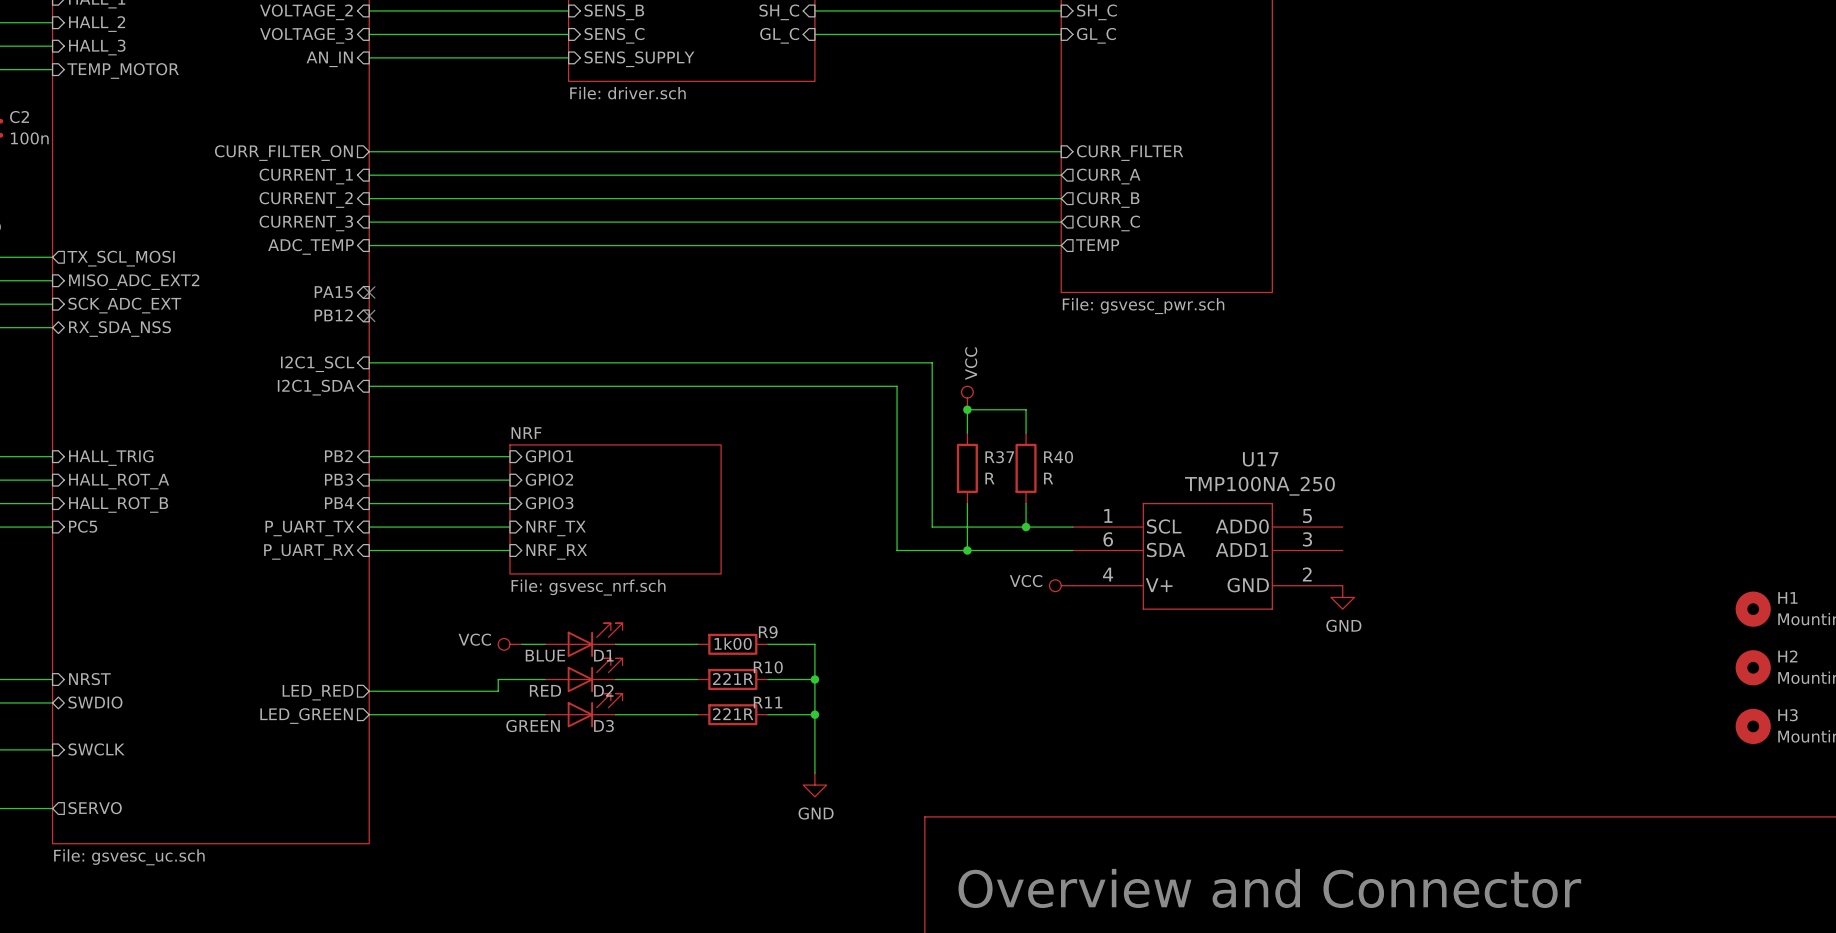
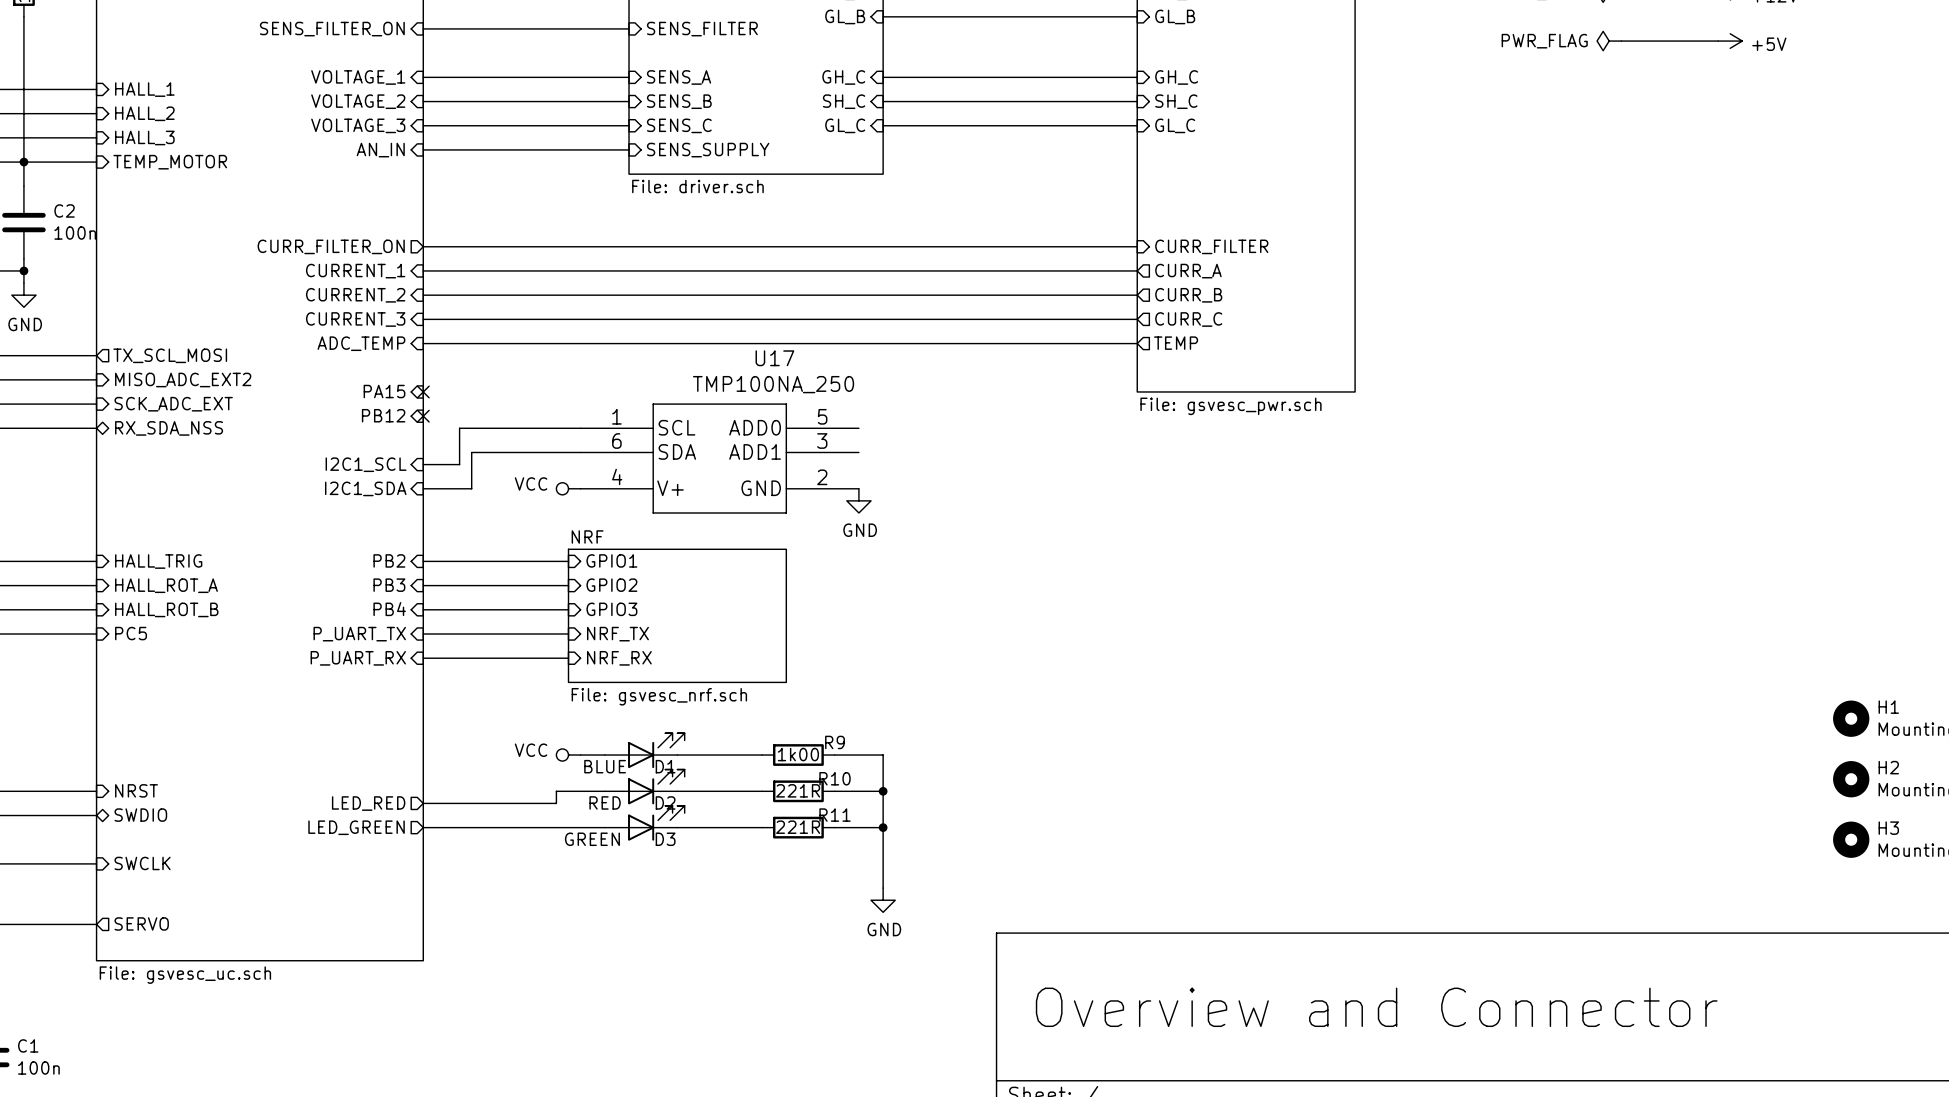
wire: (404, 362) (932, 362) (932, 527) (1072, 527) -> (459, 464) (459, 428) (580, 428)
wire: (416, 386) (897, 386) (897, 550) (1072, 550) -> (471, 488) (471, 452) (580, 452)
power symbol: none -> VCC (568, 488)
power symbol: none -> GND (858, 500)
power symbol: VCC (967, 398) -> none
junction: (967, 409) -> none
wire: (967, 433) (967, 409) (1026, 409) (1026, 433) -> none
R37: R (967, 468) -> none
R40: R (1026, 468) -> none
wire: (967, 503) (967, 550) -> none
wire: (1026, 503) (1026, 527) -> none
junction: (1026, 527) -> none
junction: (967, 550) -> none
U17 position: (1207, 556) -> (719, 458)
power symbol: VCC (1061, 585) -> none
power symbol: GND (1342, 597) -> none

